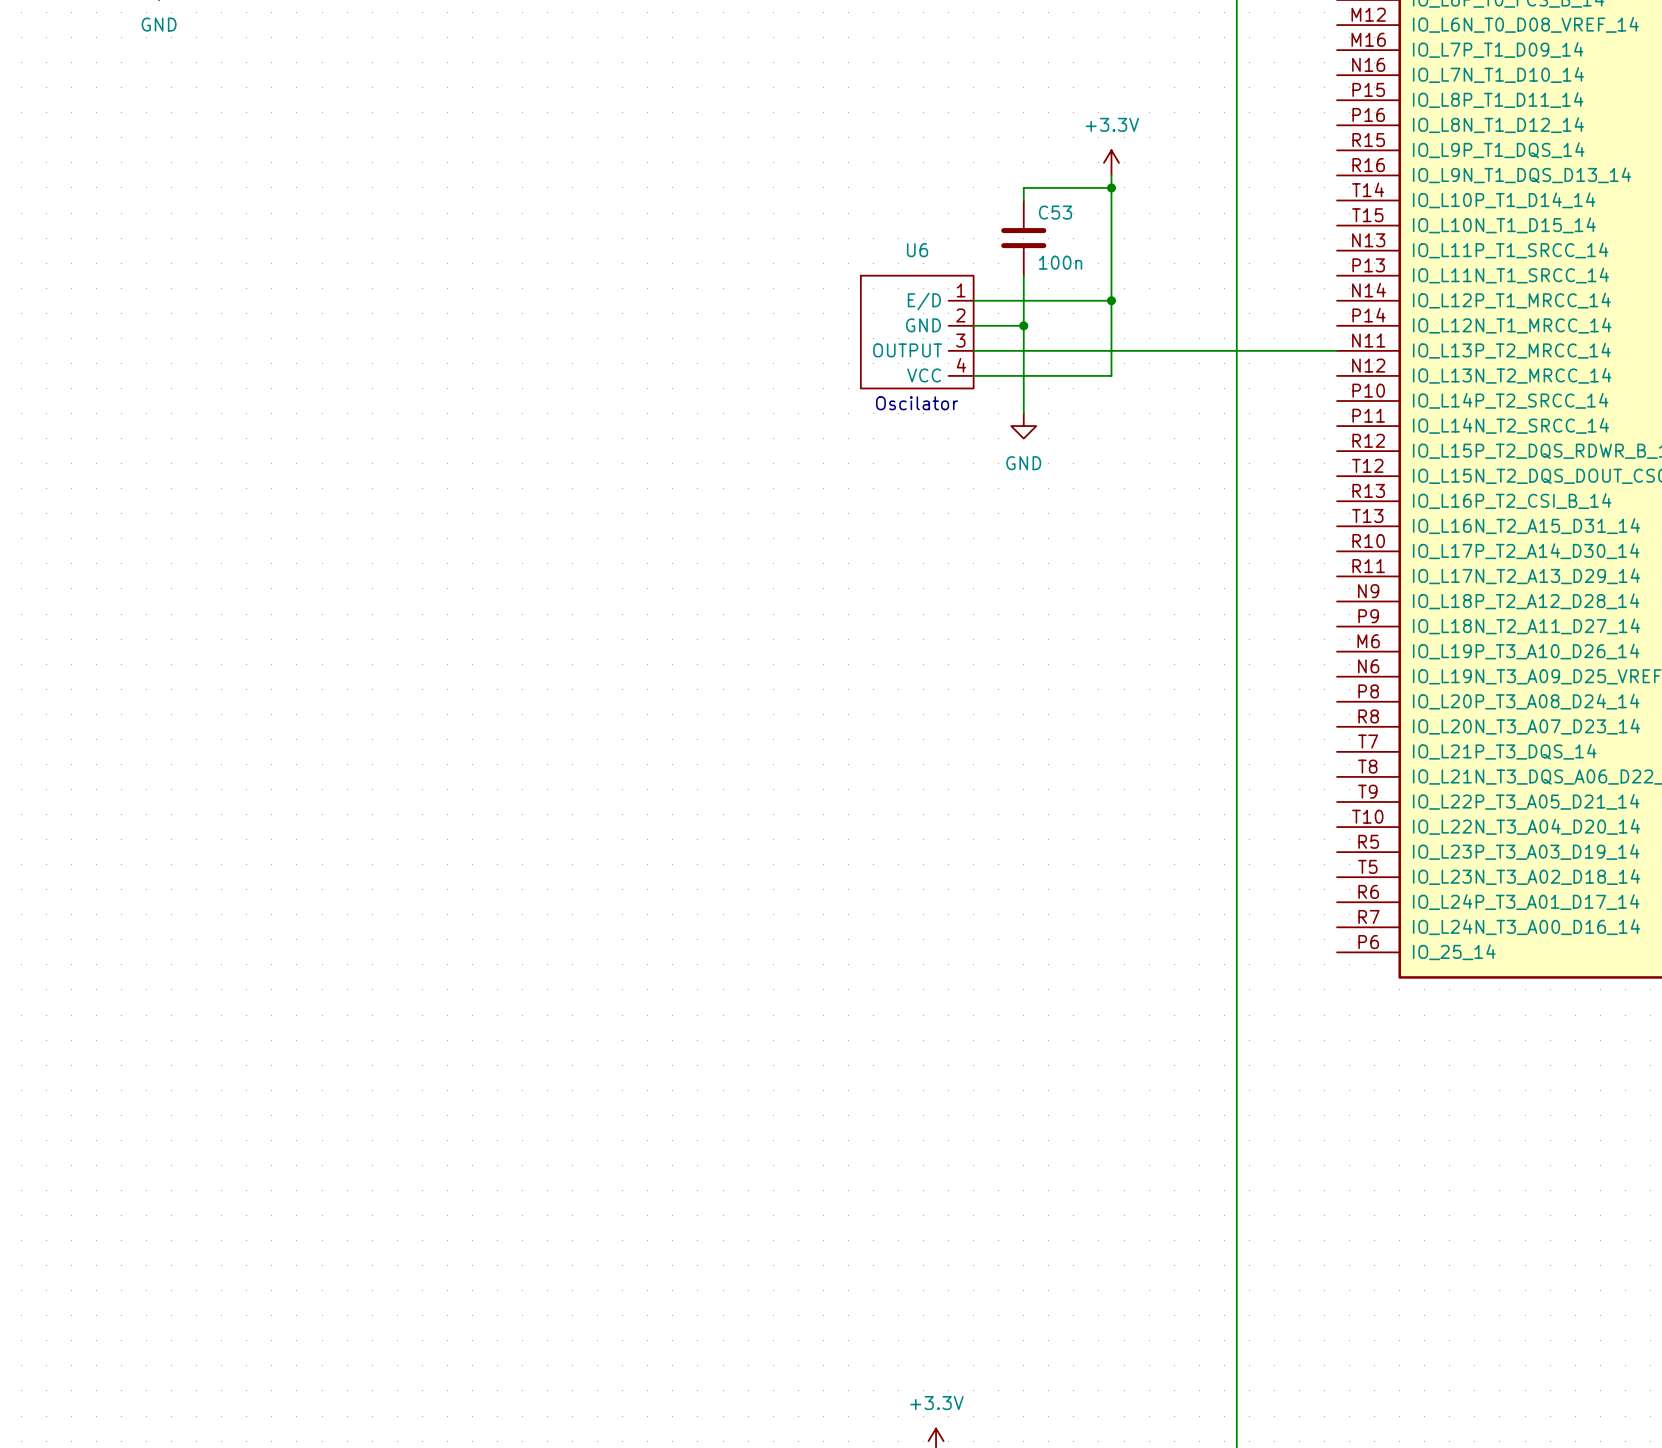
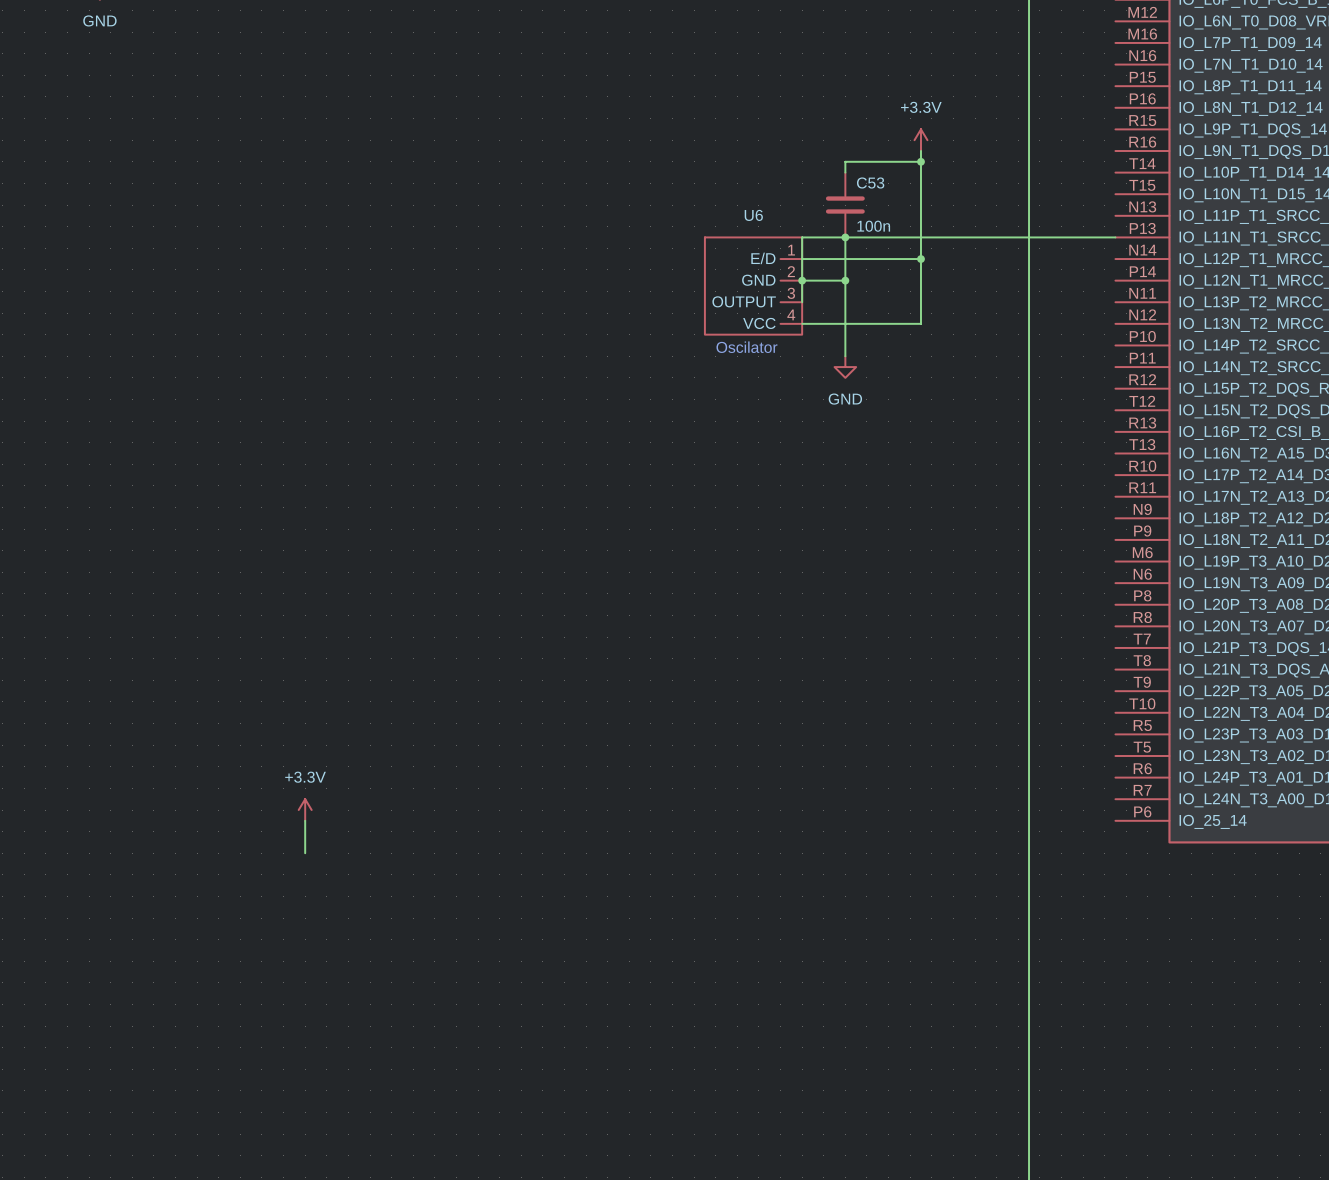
junction: none -> (845, 237)
junction: none -> (802, 280)
wire: (973, 350) (1337, 350) -> (802, 302) (802, 237) (1115, 237)
power symbol: none -> +3.3V (305, 810)
wire: none -> (305, 820) (305, 853)

